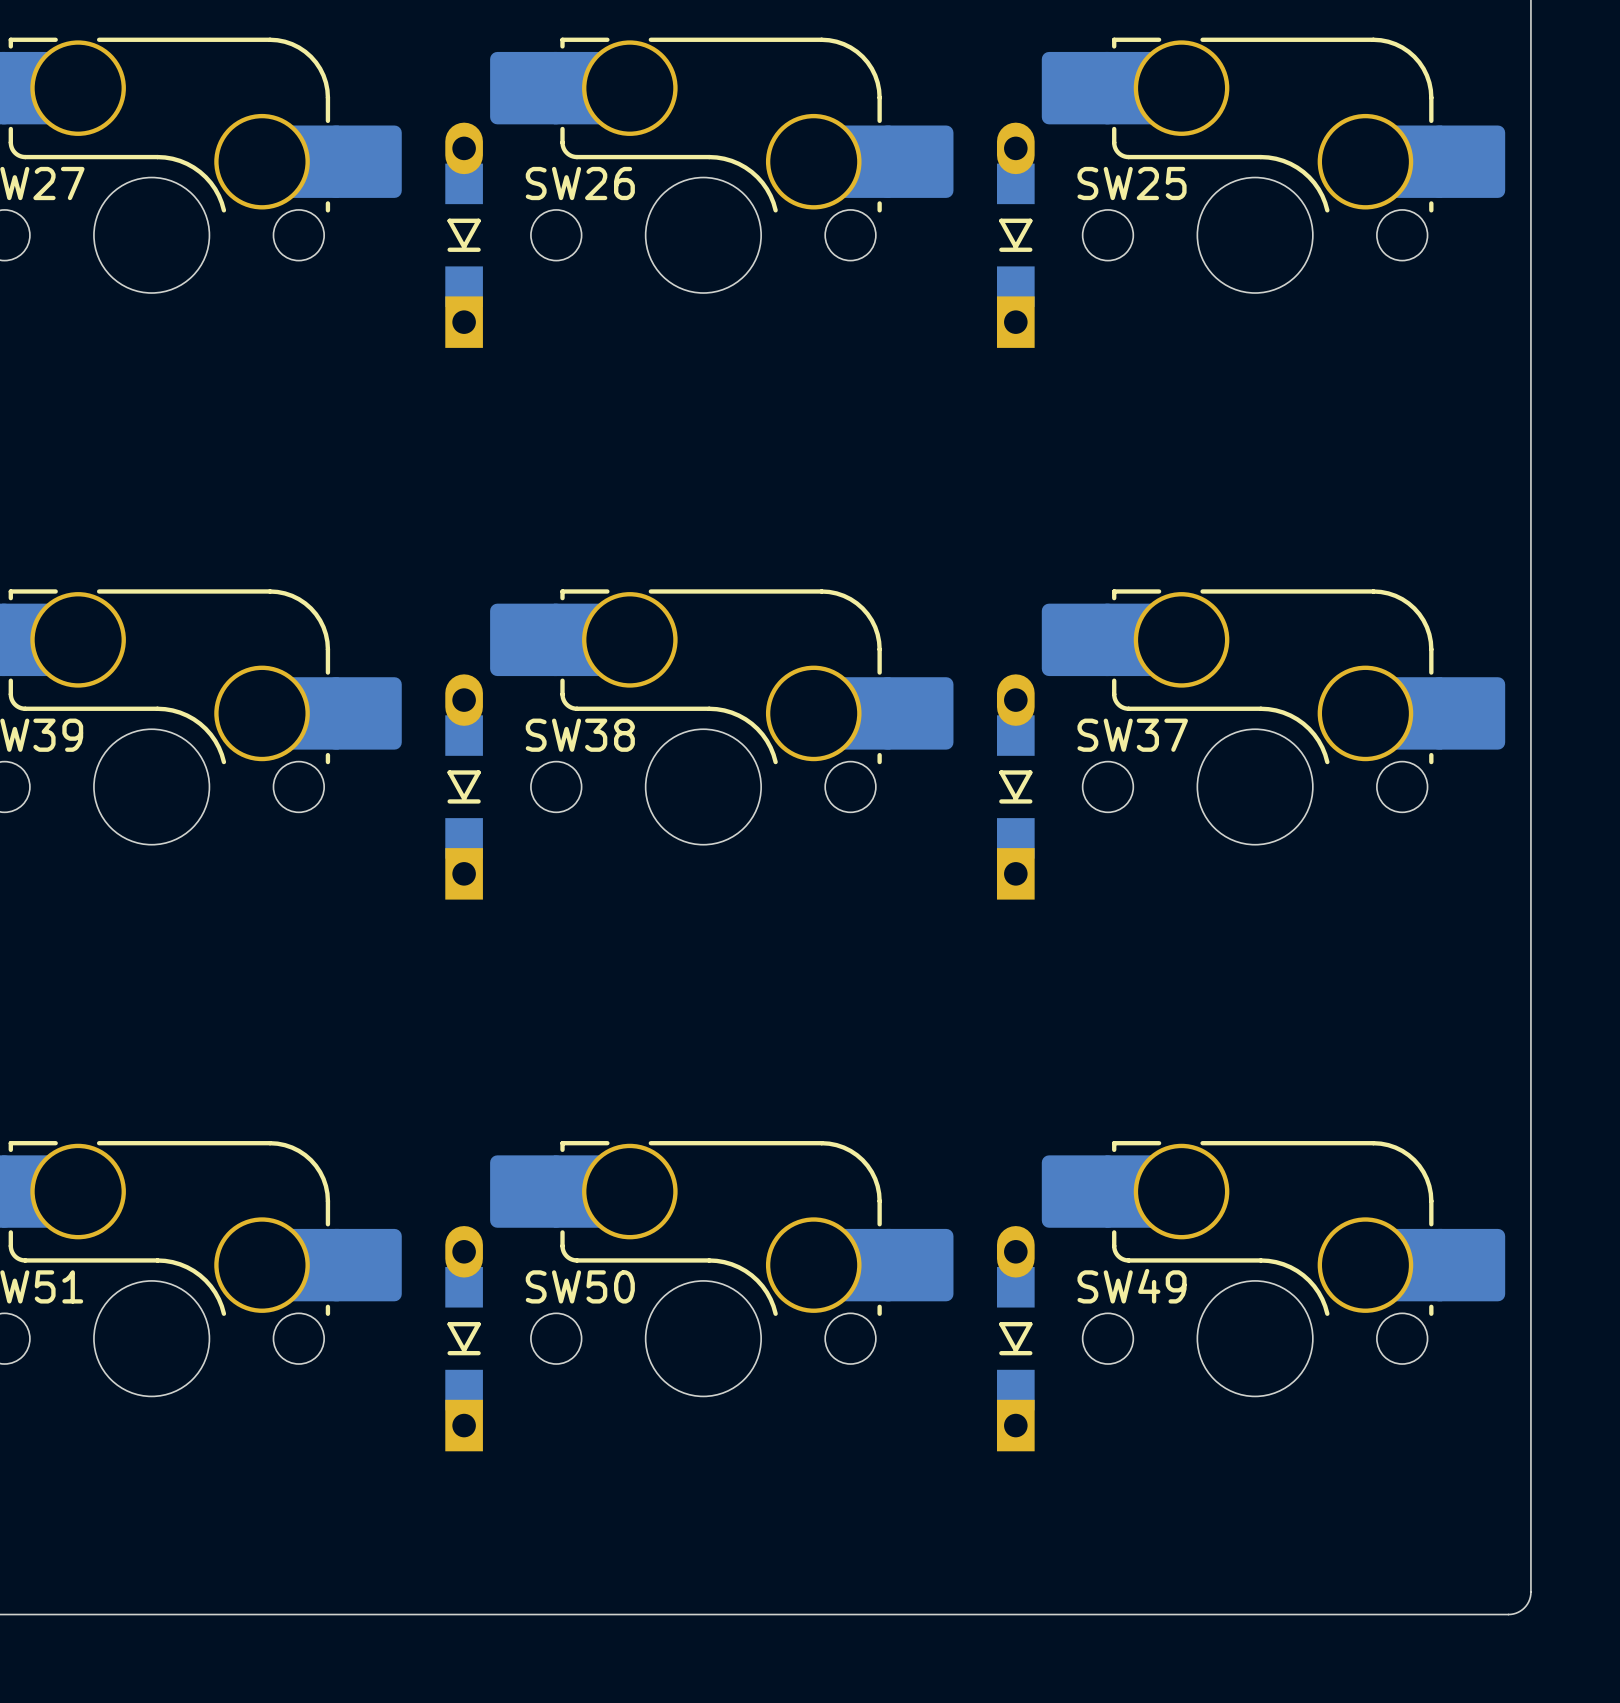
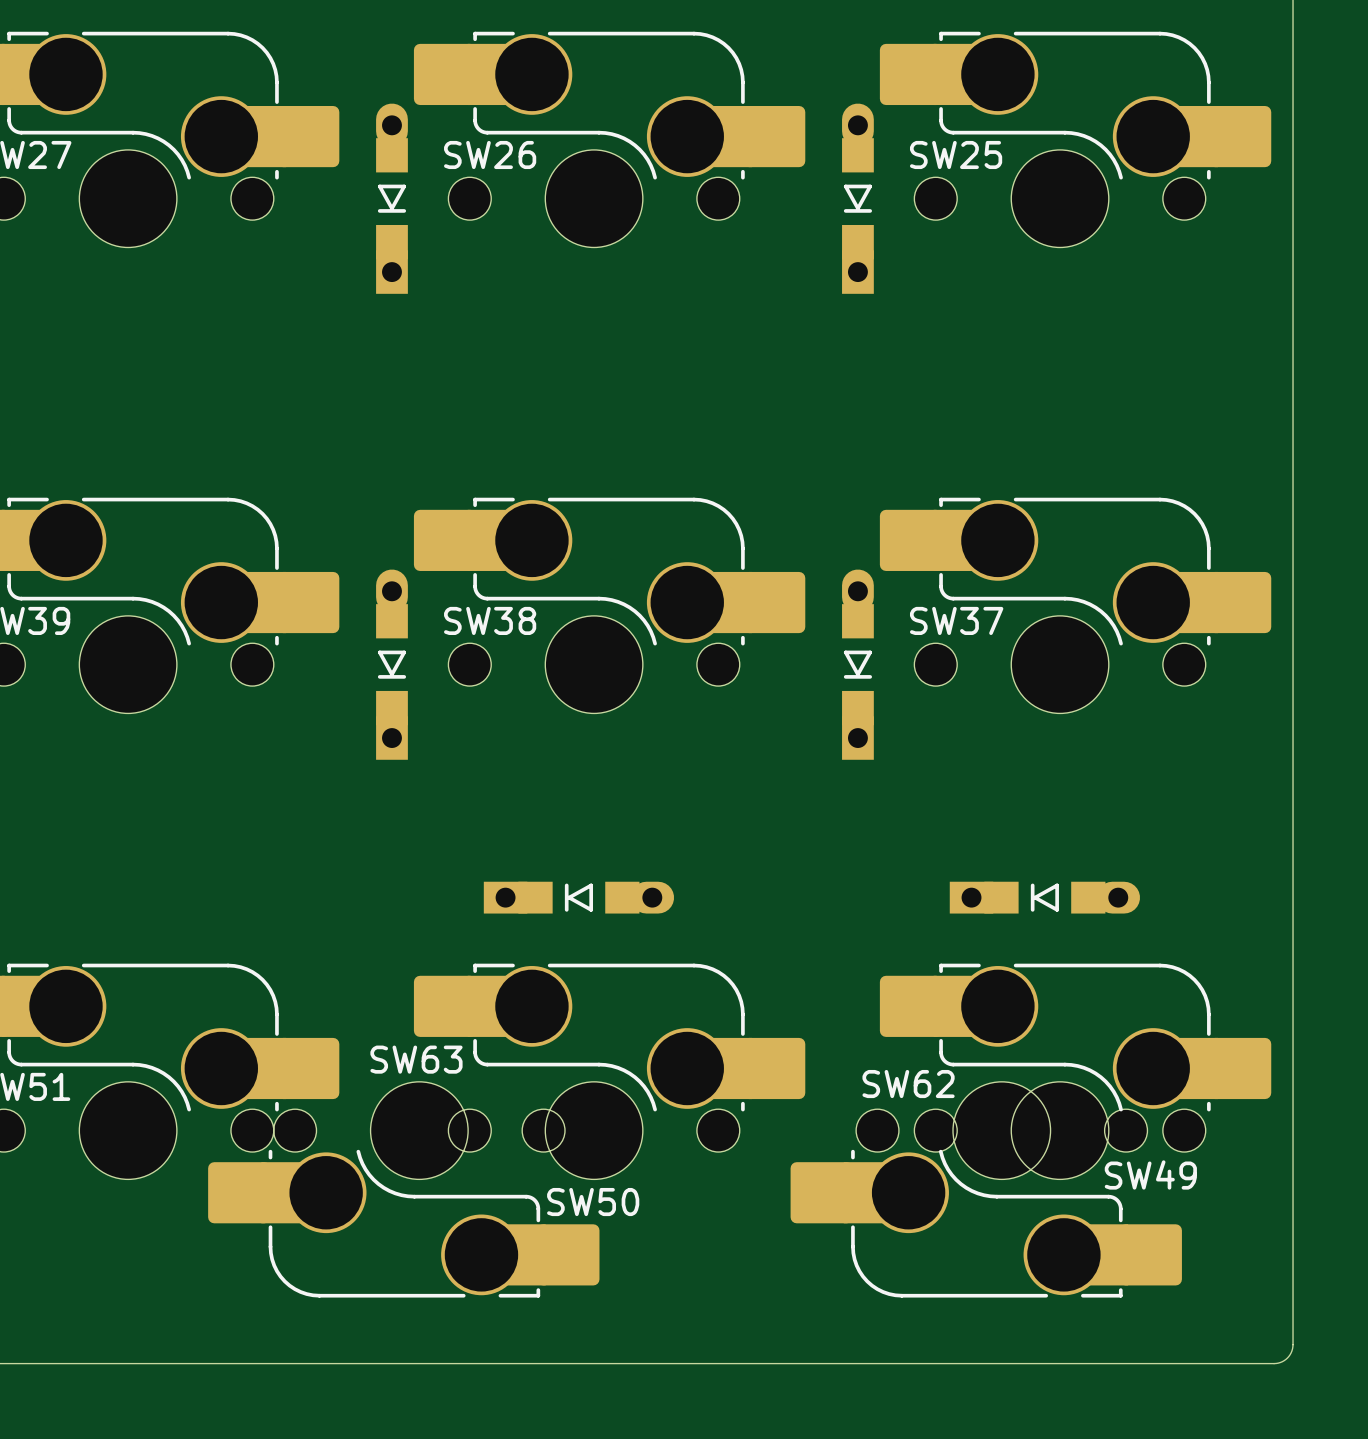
part: none -> (578, 897)
part: none -> (1044, 897)
SW50 name position: SW50 (580, 1286) -> SW50 (593, 1202)
SW49 name position: SW49 (1132, 1286) -> SW49 (1150, 1174)
part: (464, 1338) -> none
part: (1015, 1338) -> none
SW63: none -> (403, 1189)
SW62: none -> (986, 1189)

